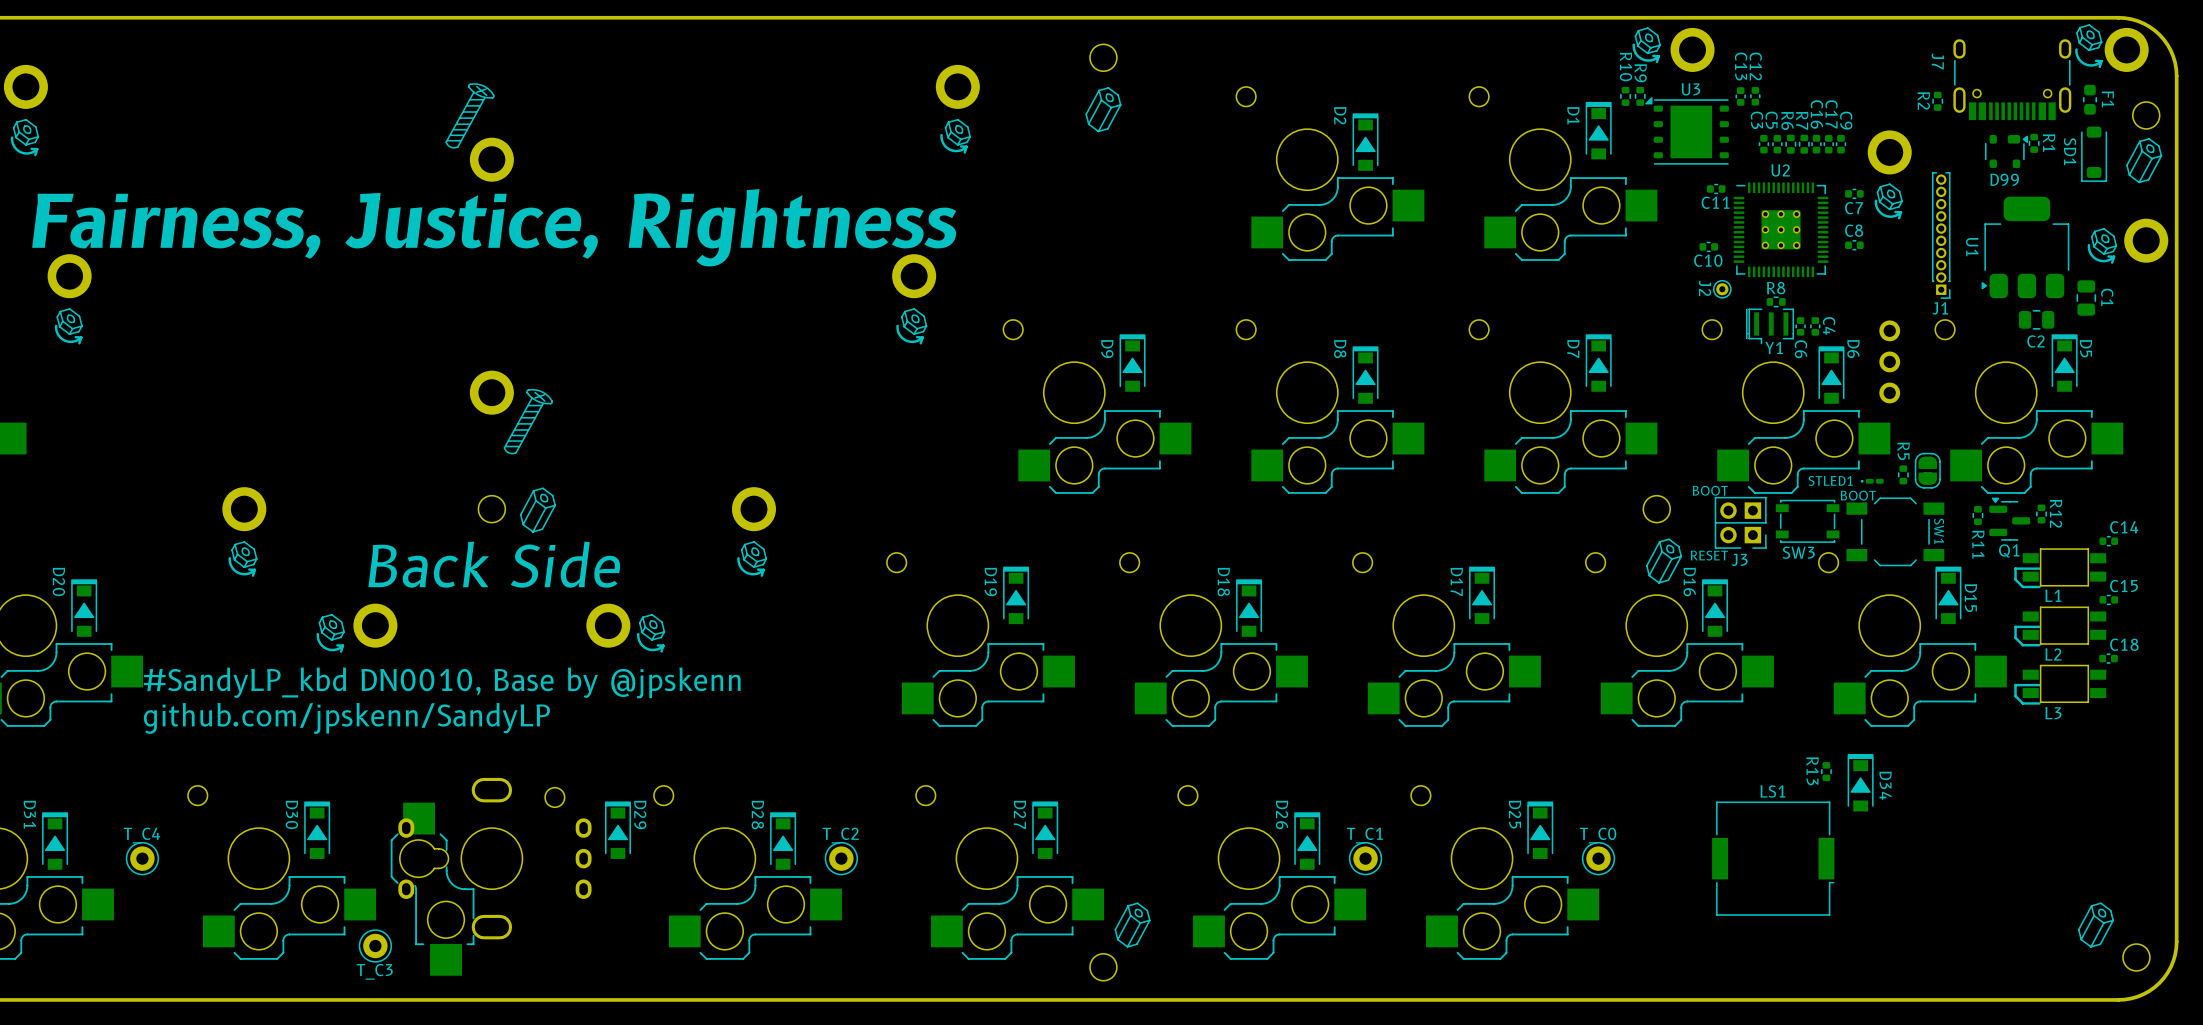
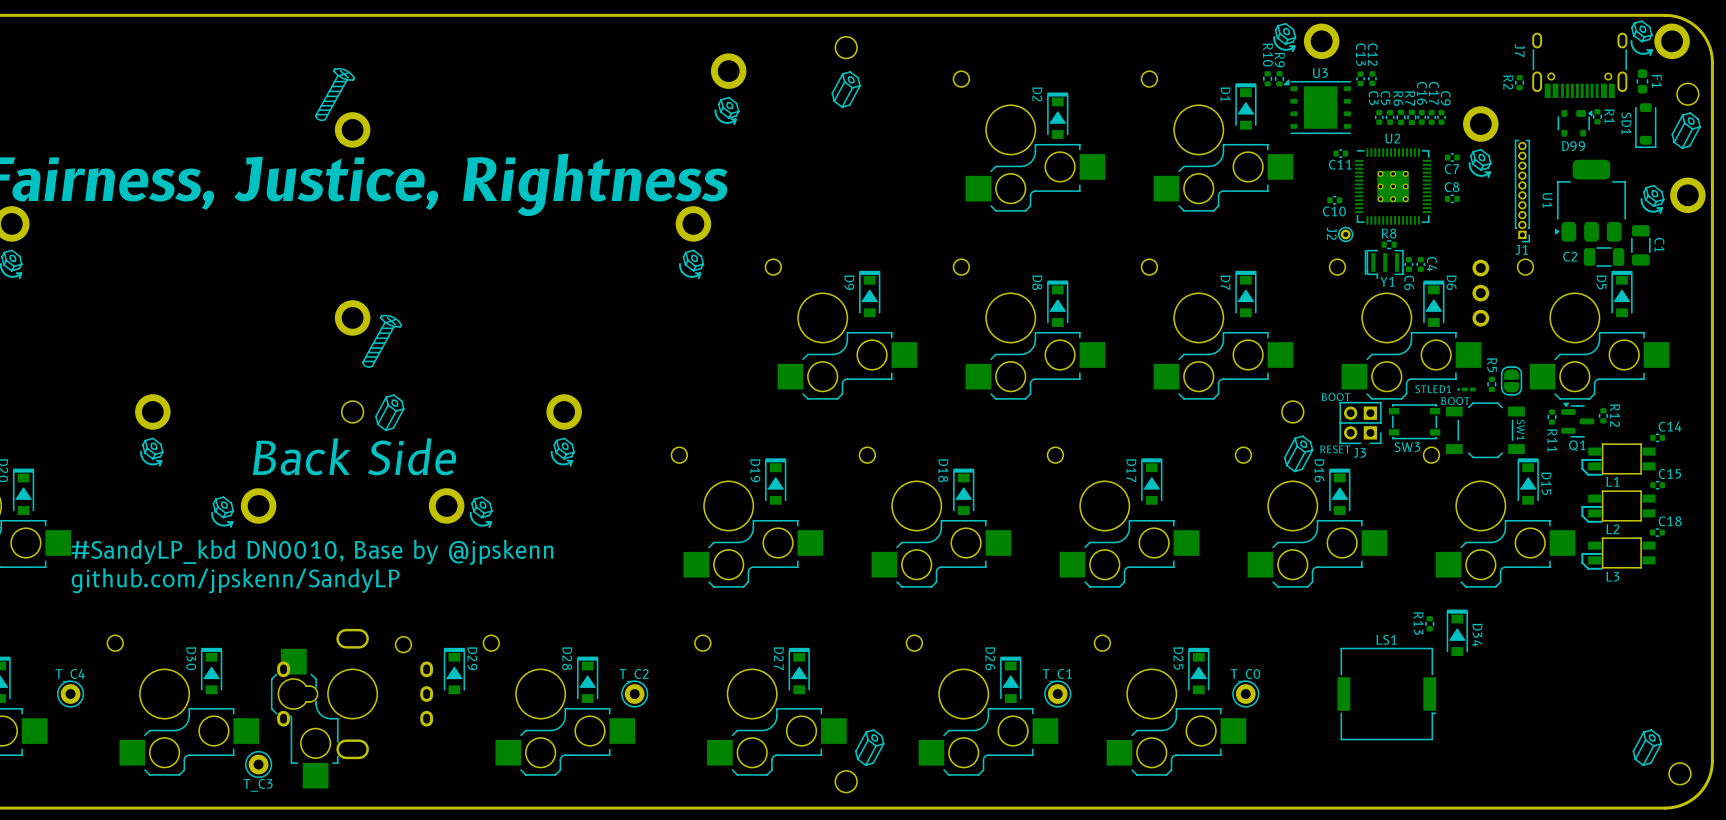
C1 footprint: [2076, 280, 2097, 316] -> [1631, 225, 1651, 266]
C2 footprint: [2018, 310, 2055, 330] -> [1583, 247, 1625, 267]
C2 name position: C2 (2036, 341) -> C2 (1570, 256)
D5 name position: D5 (2085, 348) -> D5 (1601, 282)

